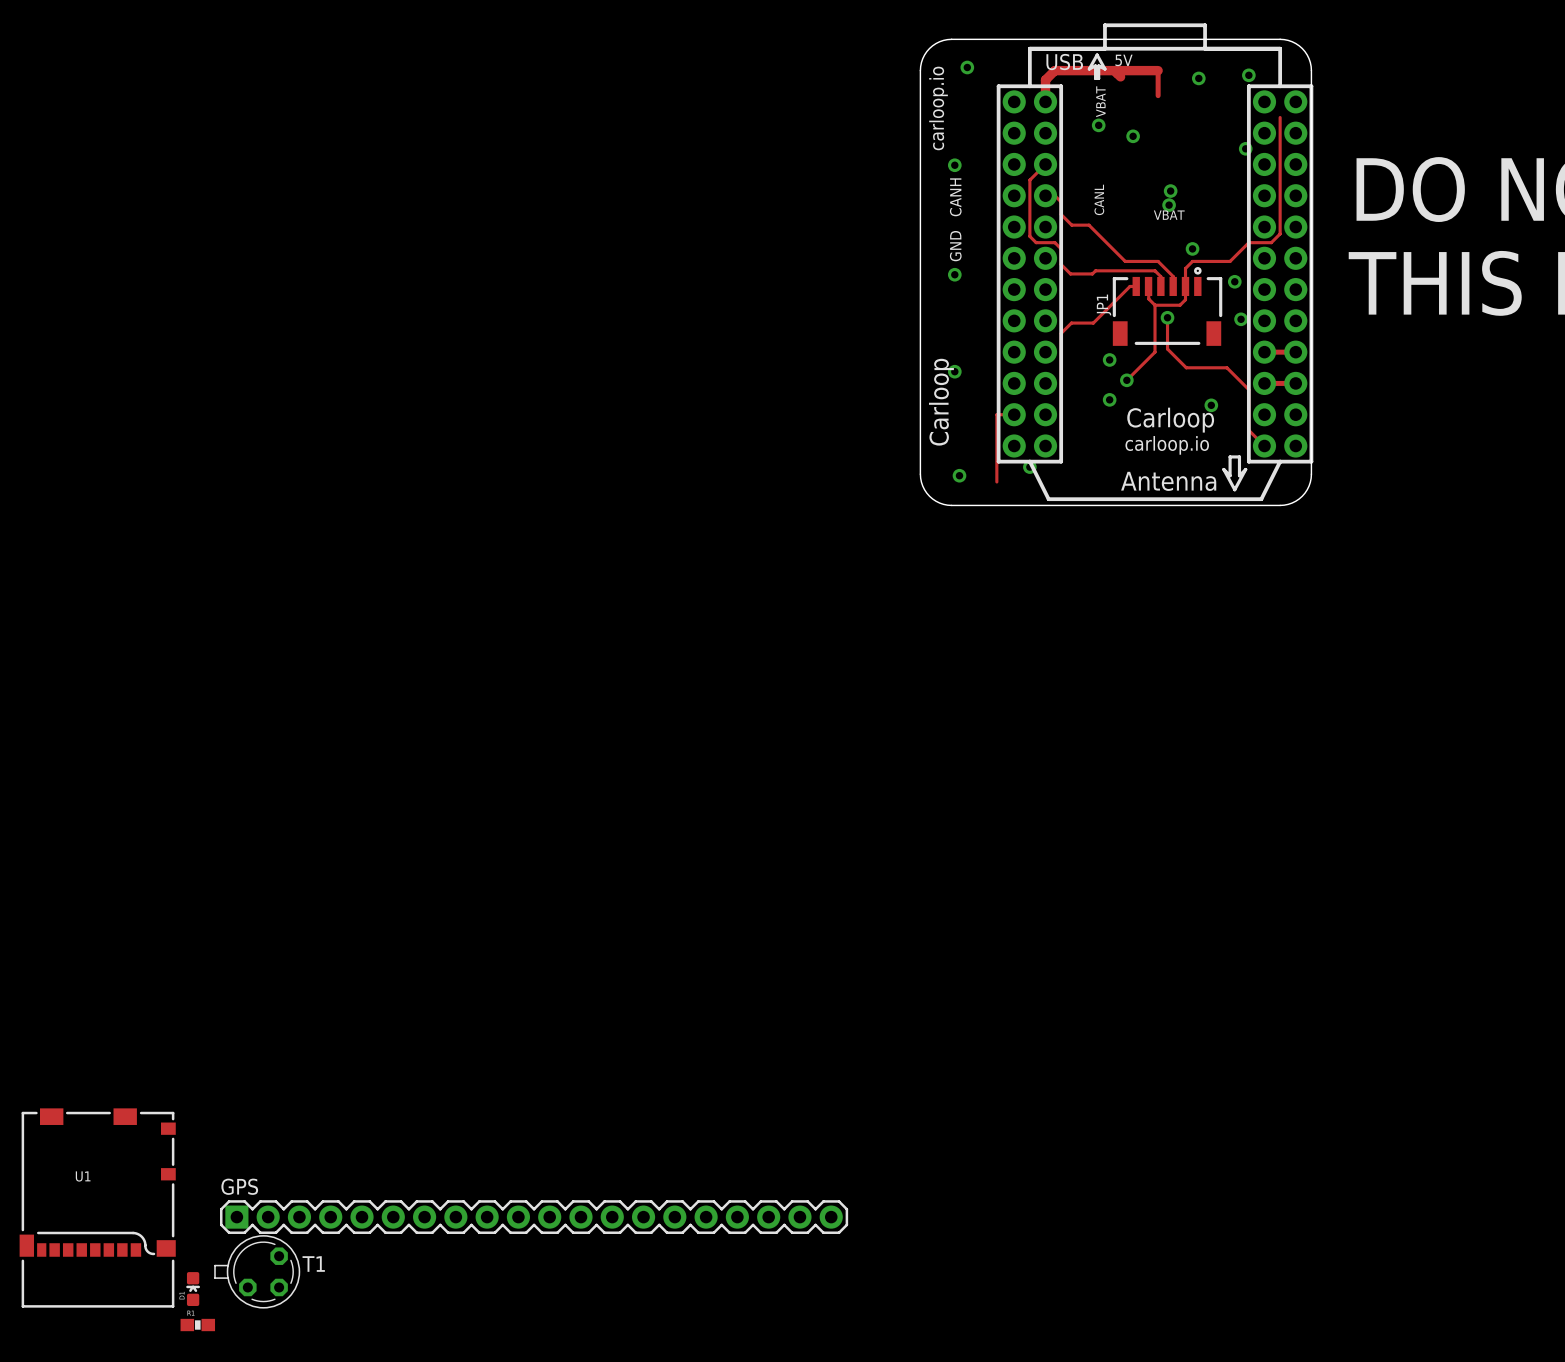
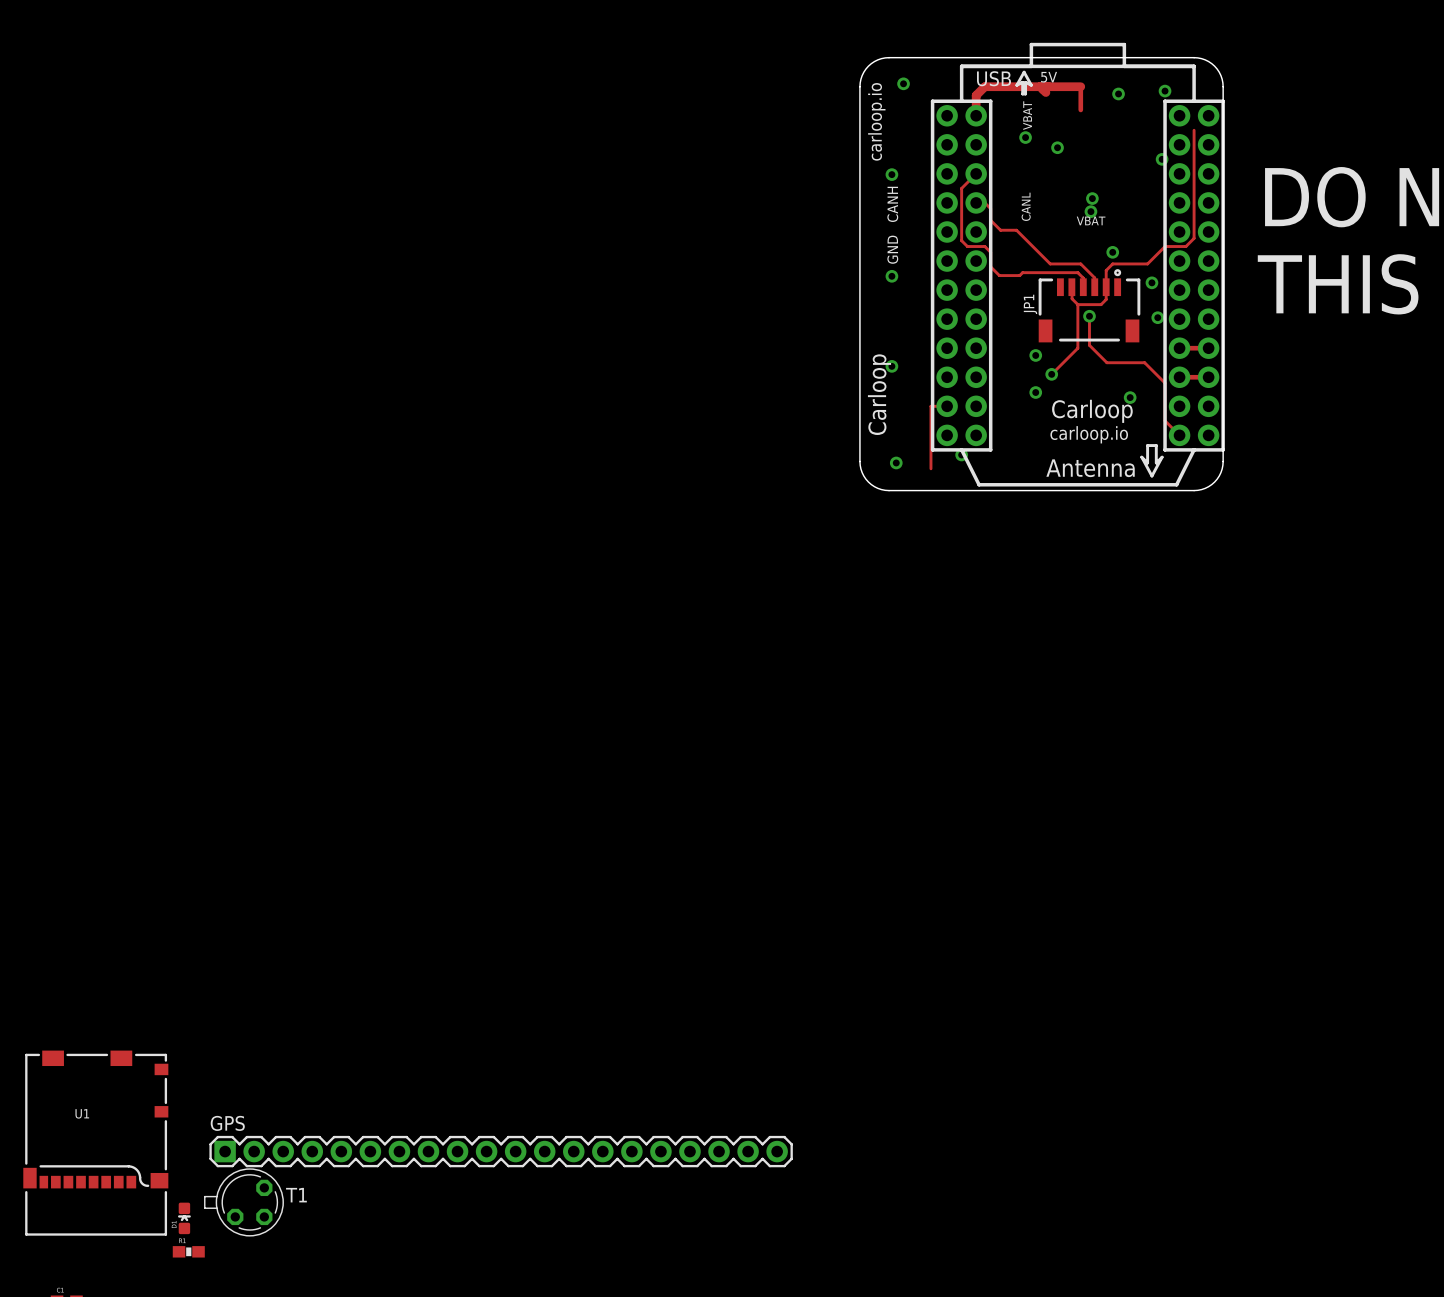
track: (1136, 286) (1129, 286) (1093, 323) (1071, 323) (1061, 333) (1061, 430) -> none

